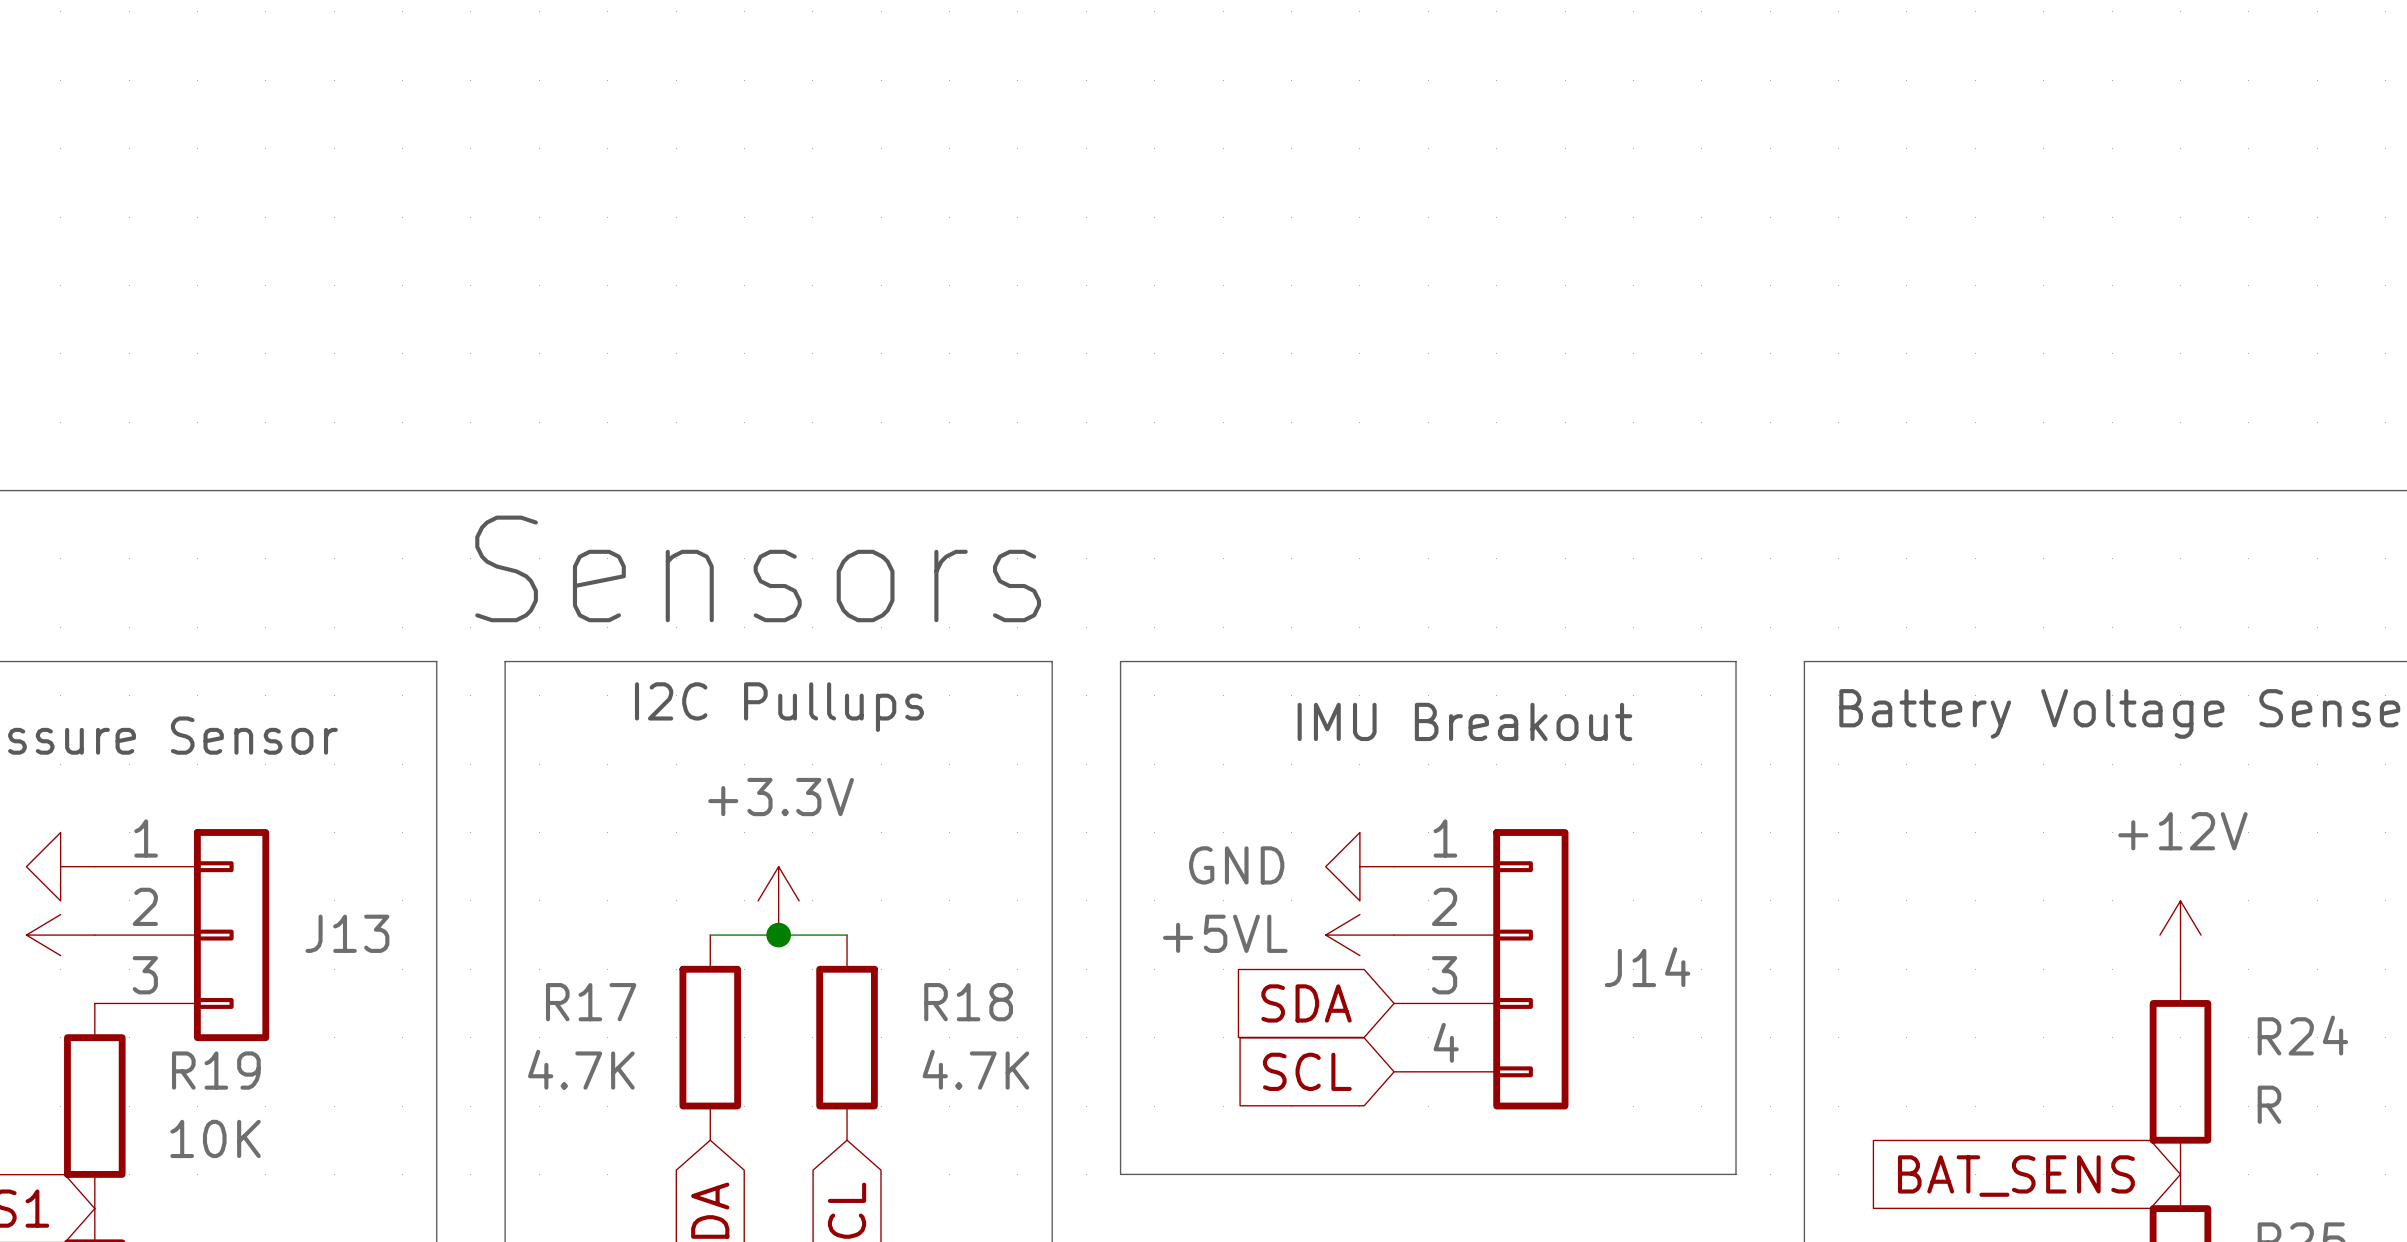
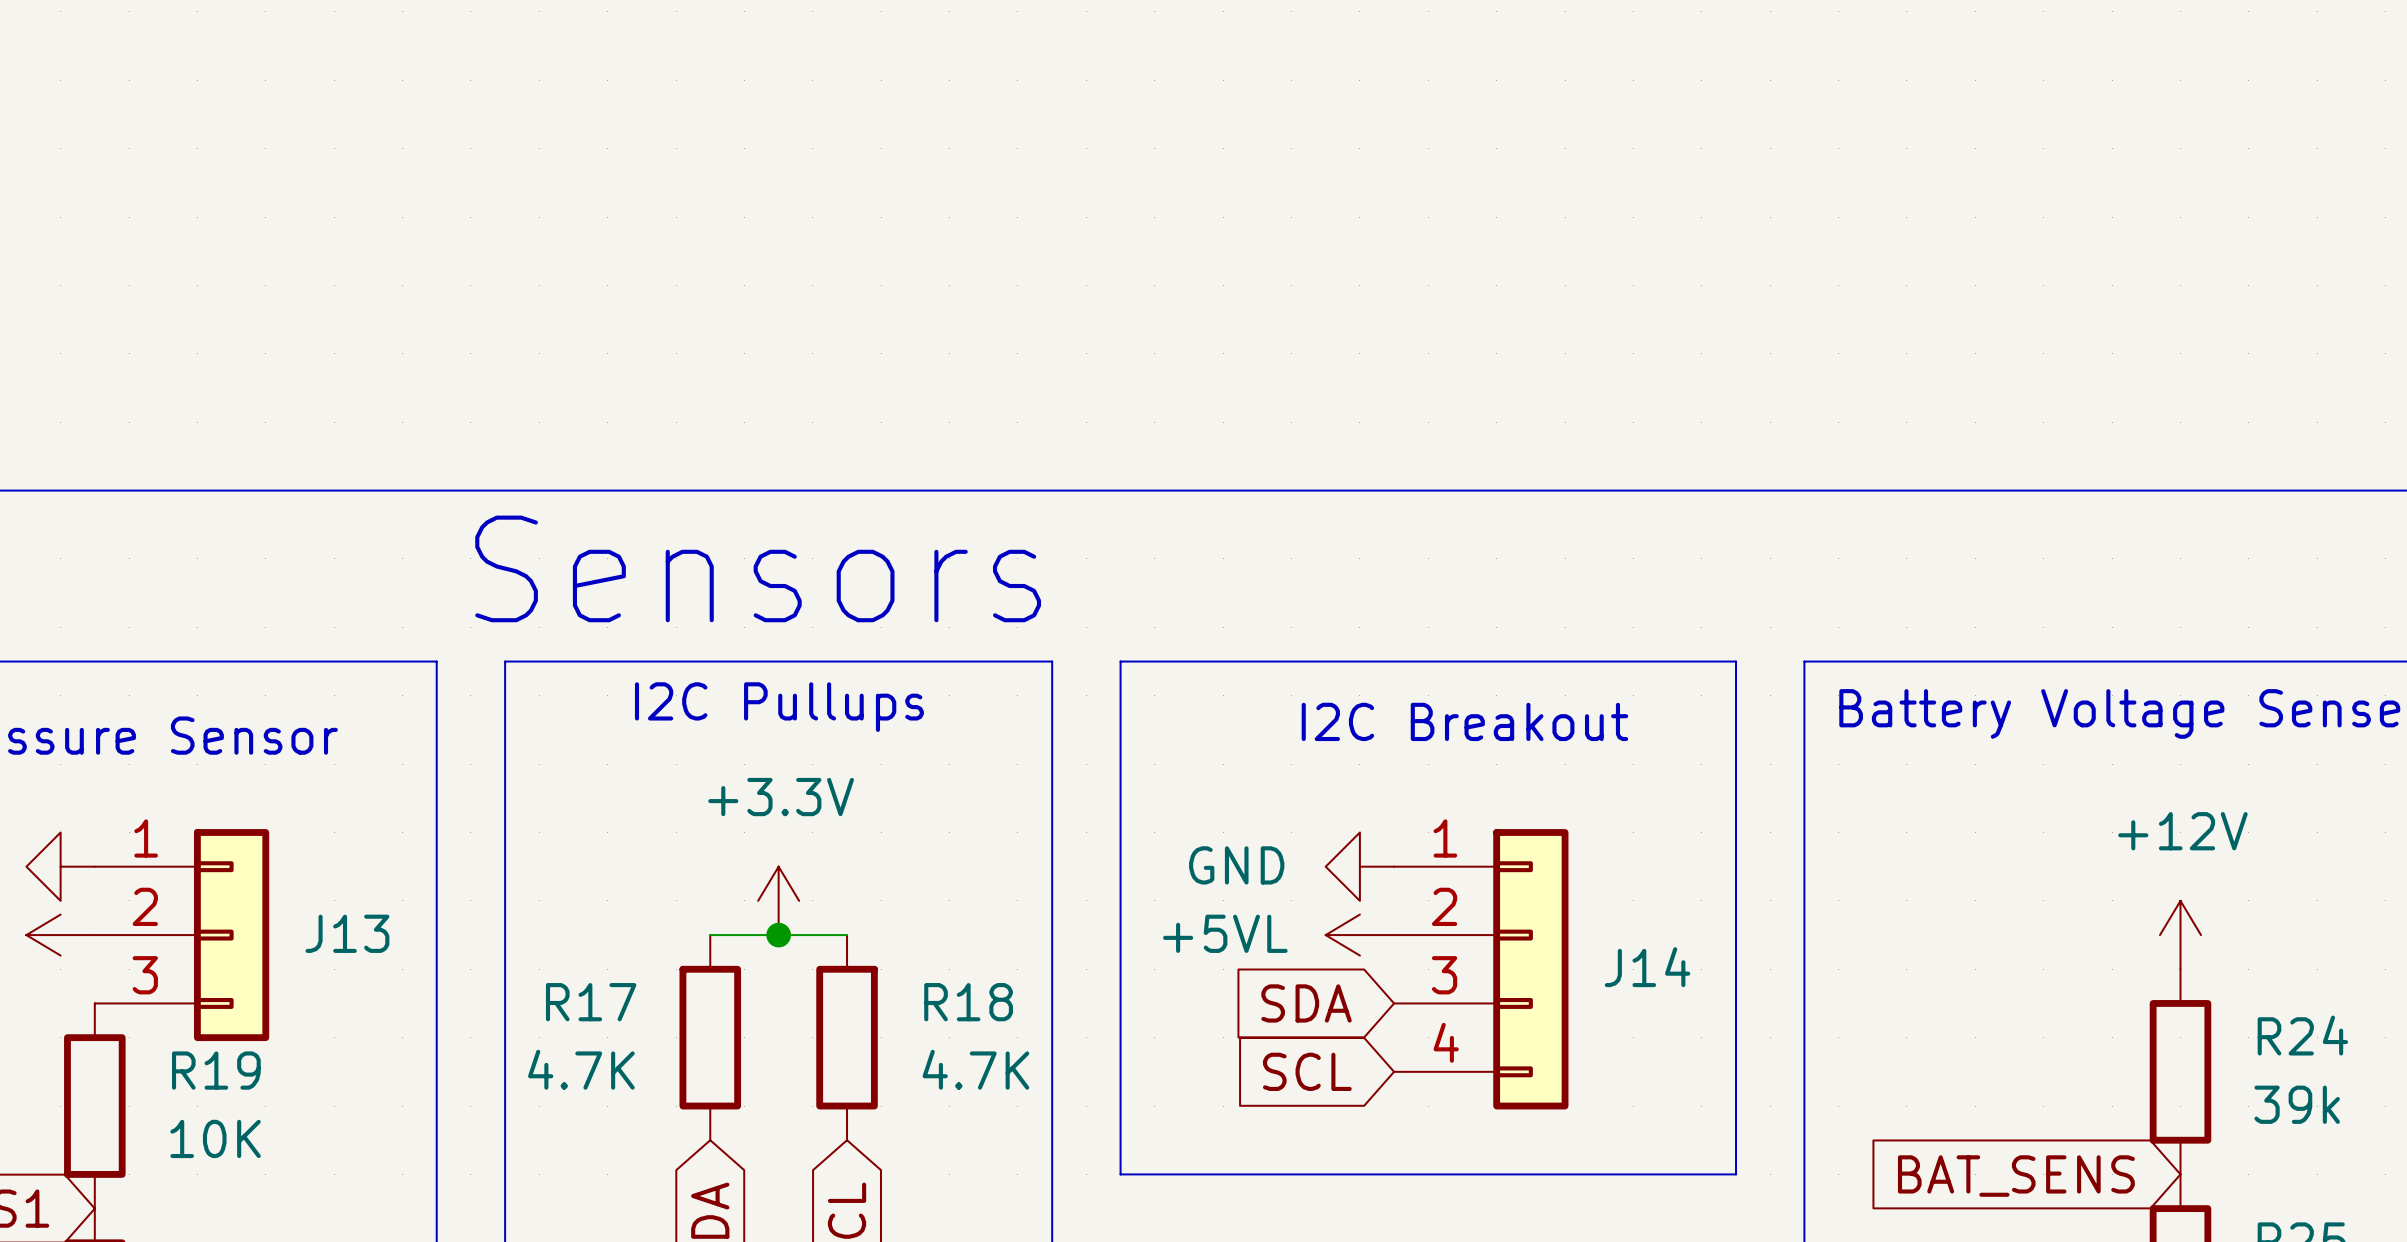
text: IMU Breakout (1464, 721) -> I2C Breakout (1464, 721)
R24 value: R (2269, 1104) -> 39k (2297, 1104)

